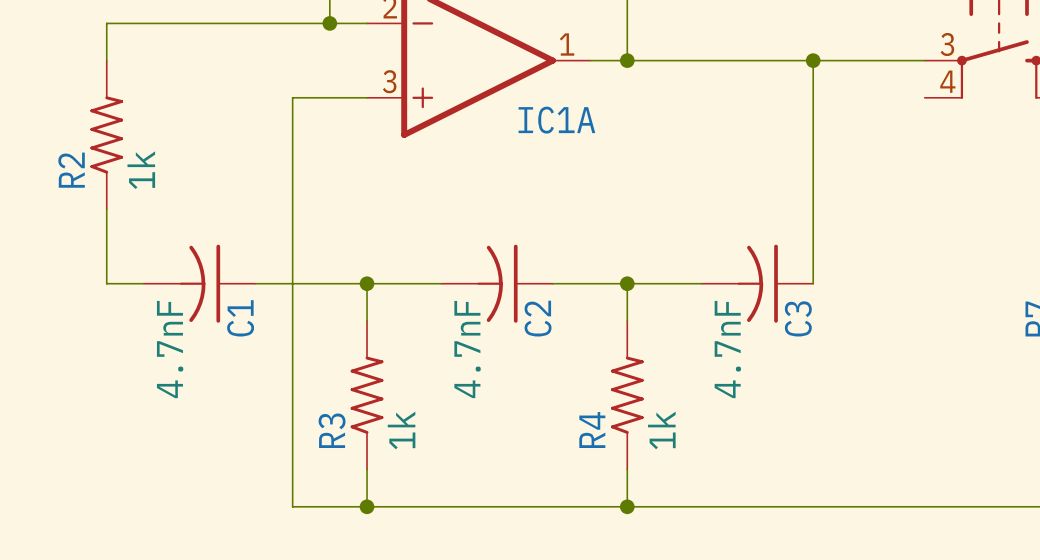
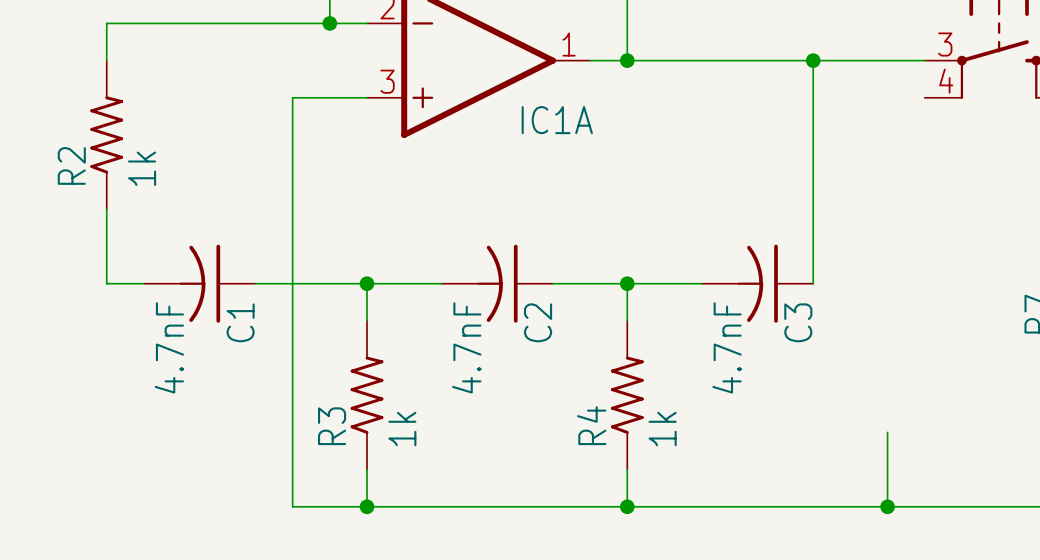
wire: none -> (887, 432) (887, 506)
junction: none -> (887, 506)

